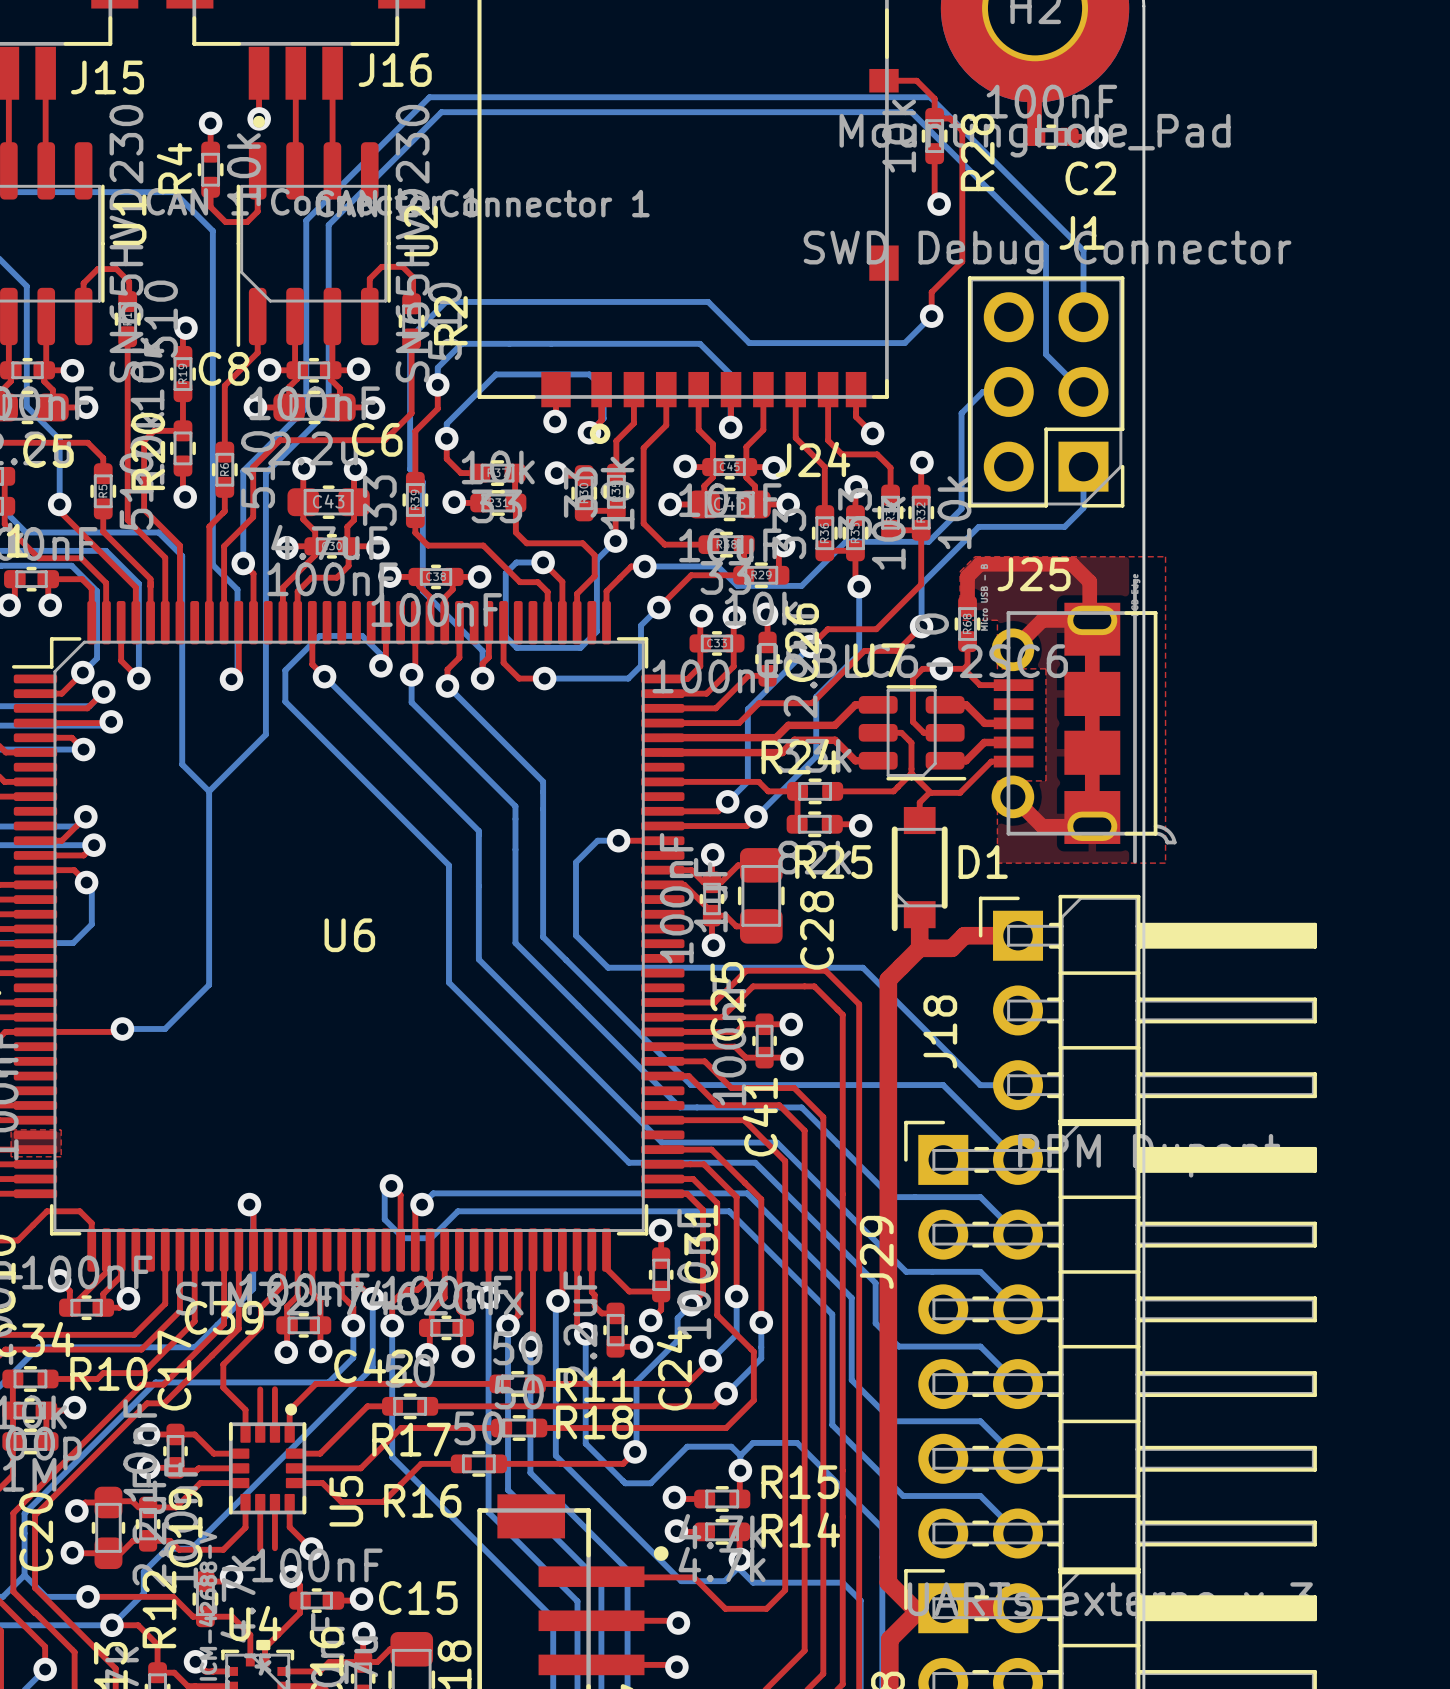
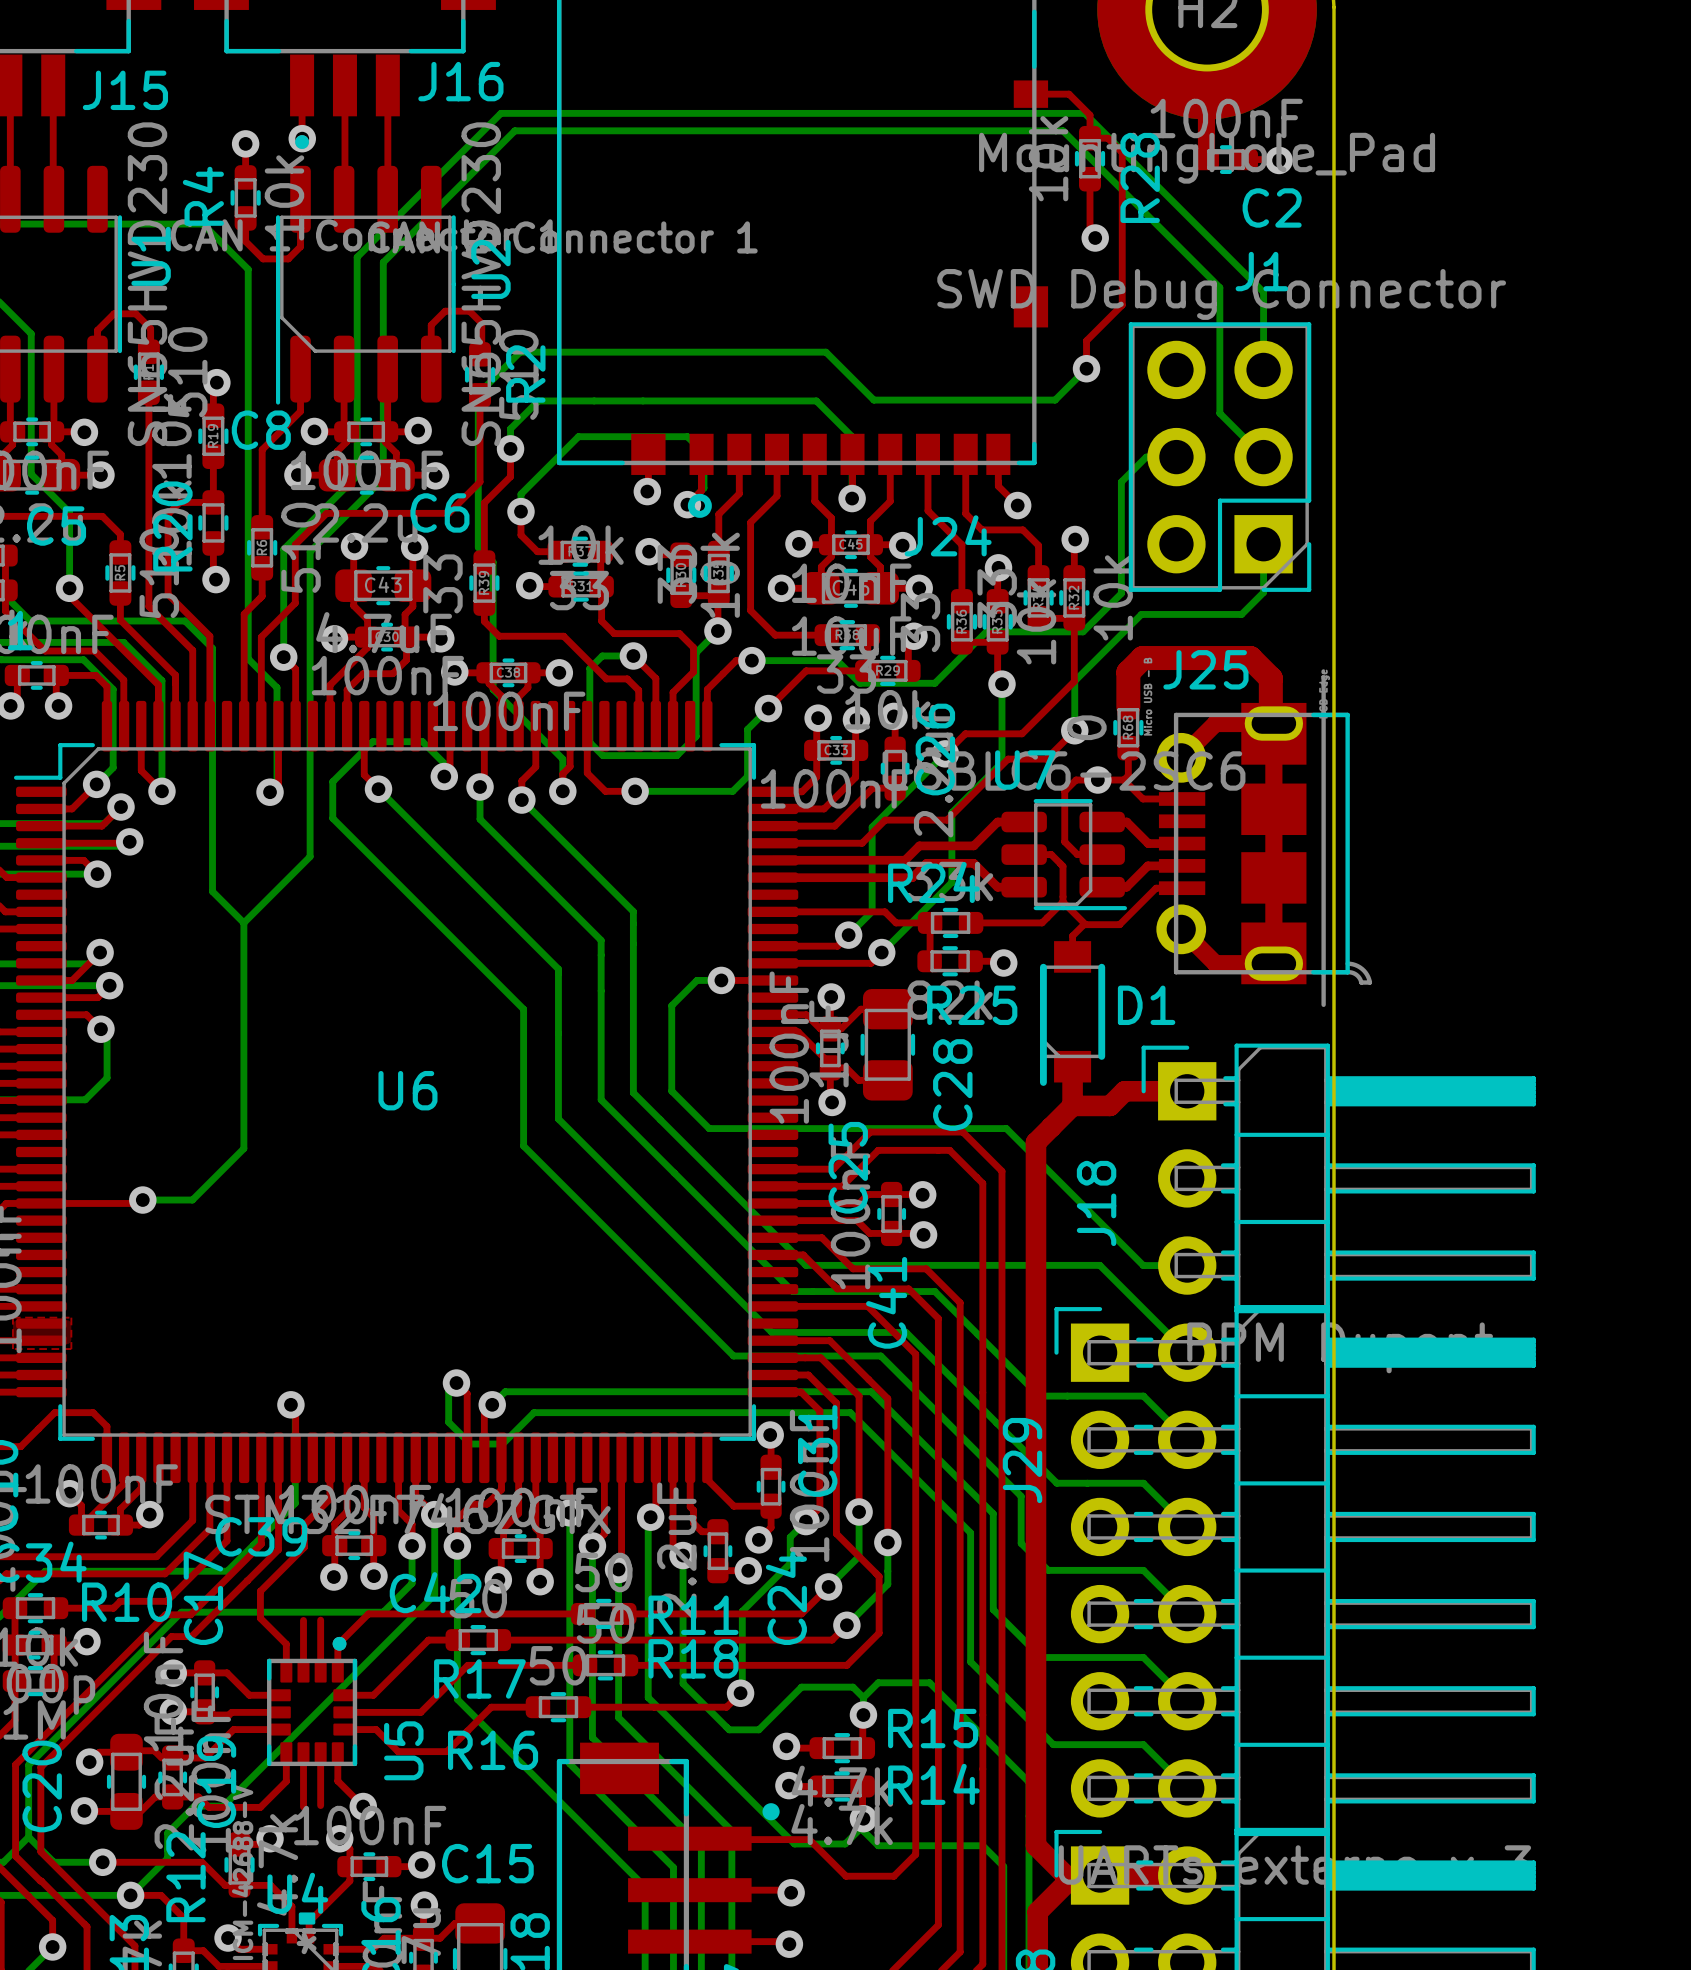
top zone outline: (975, 556) (960, 571) (960, 620) (997, 620) (997, 668) (1045, 668) (1045, 780) (997, 780) (997, 863) (1165, 863) (1165, 556) (975, 556) -> none
top track width: thin (967, 606) (967, 576) (979, 564) (1072, 564) (1089, 581) (1089, 617) -> thick (1128, 707) (1128, 672) (1142, 658) (1250, 658) (1270, 678) (1270, 720)

